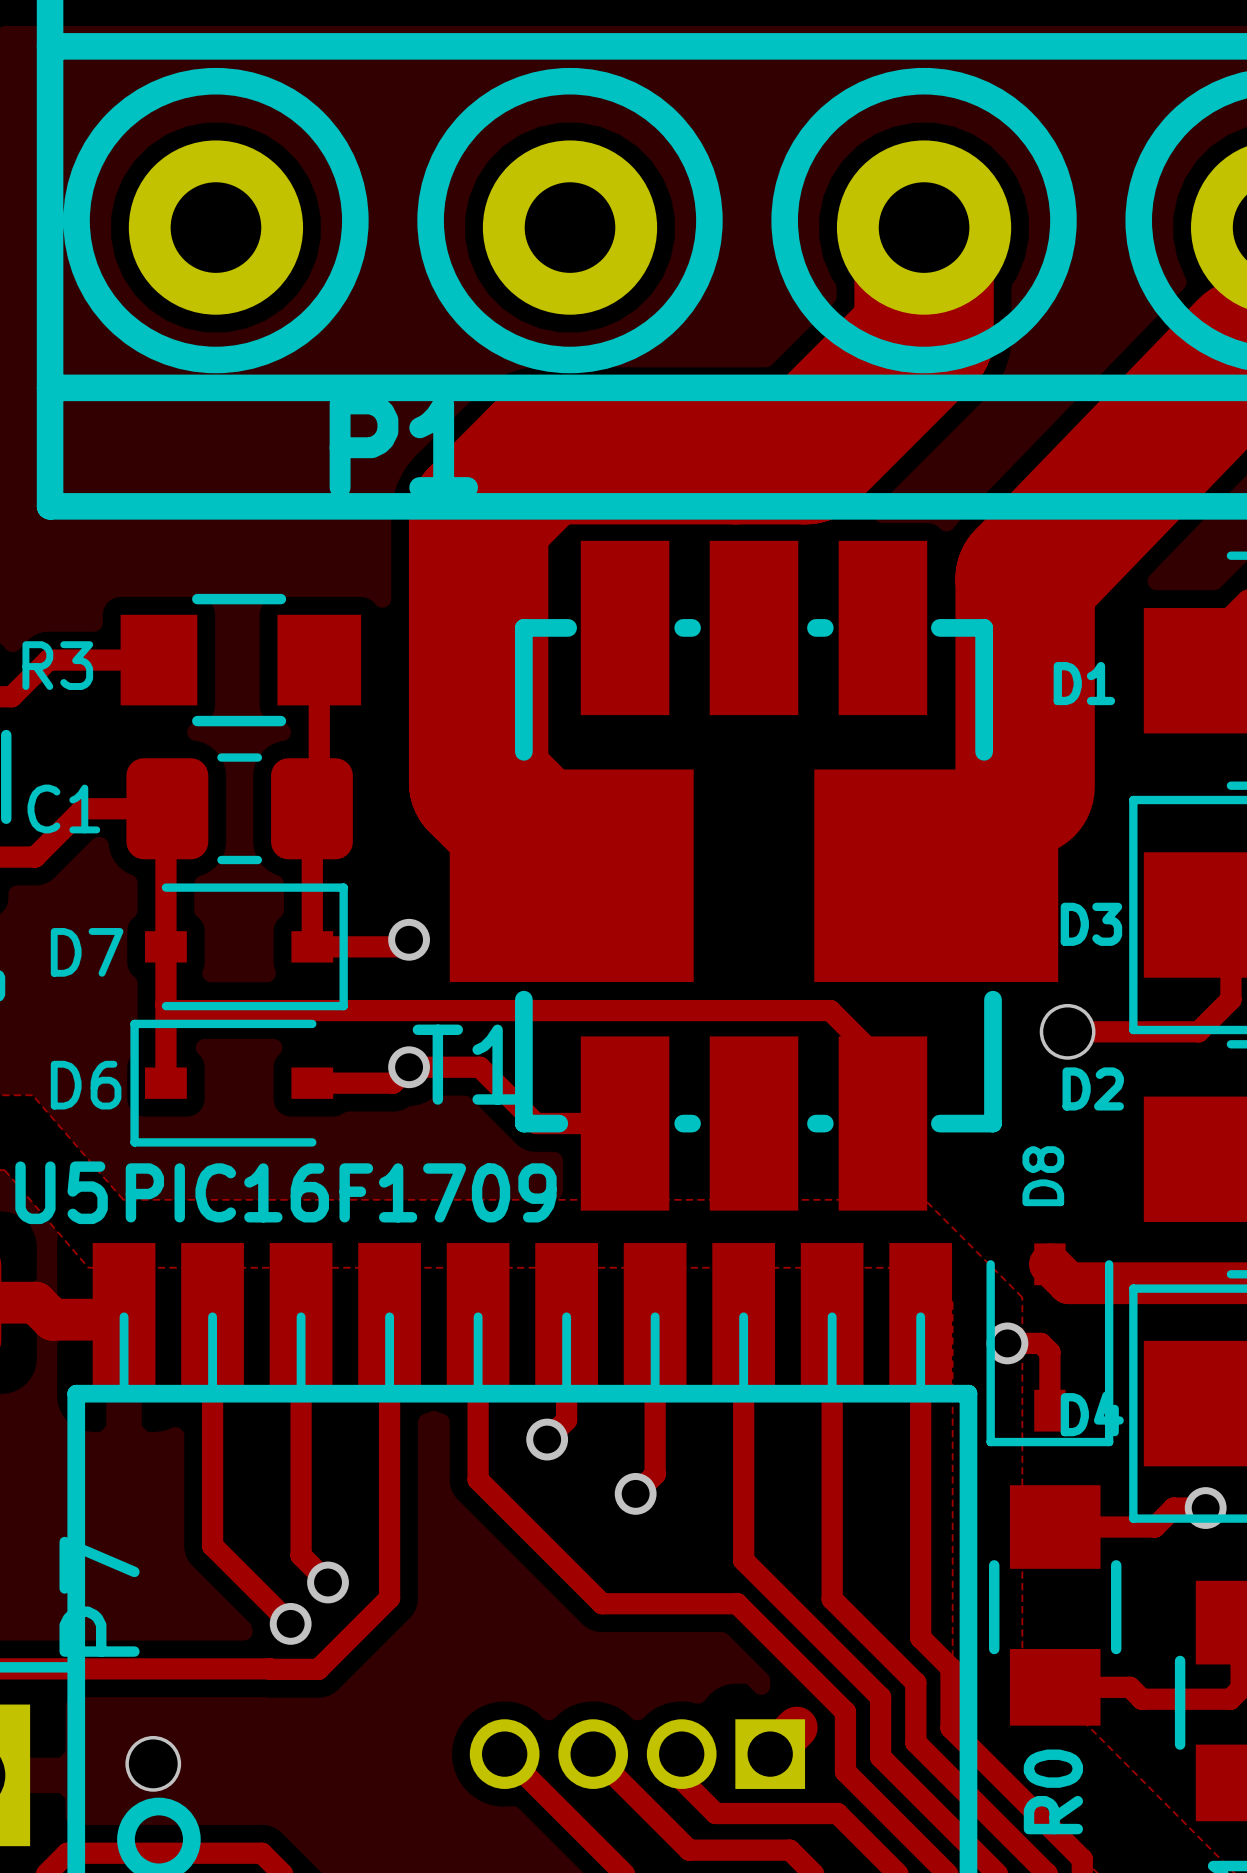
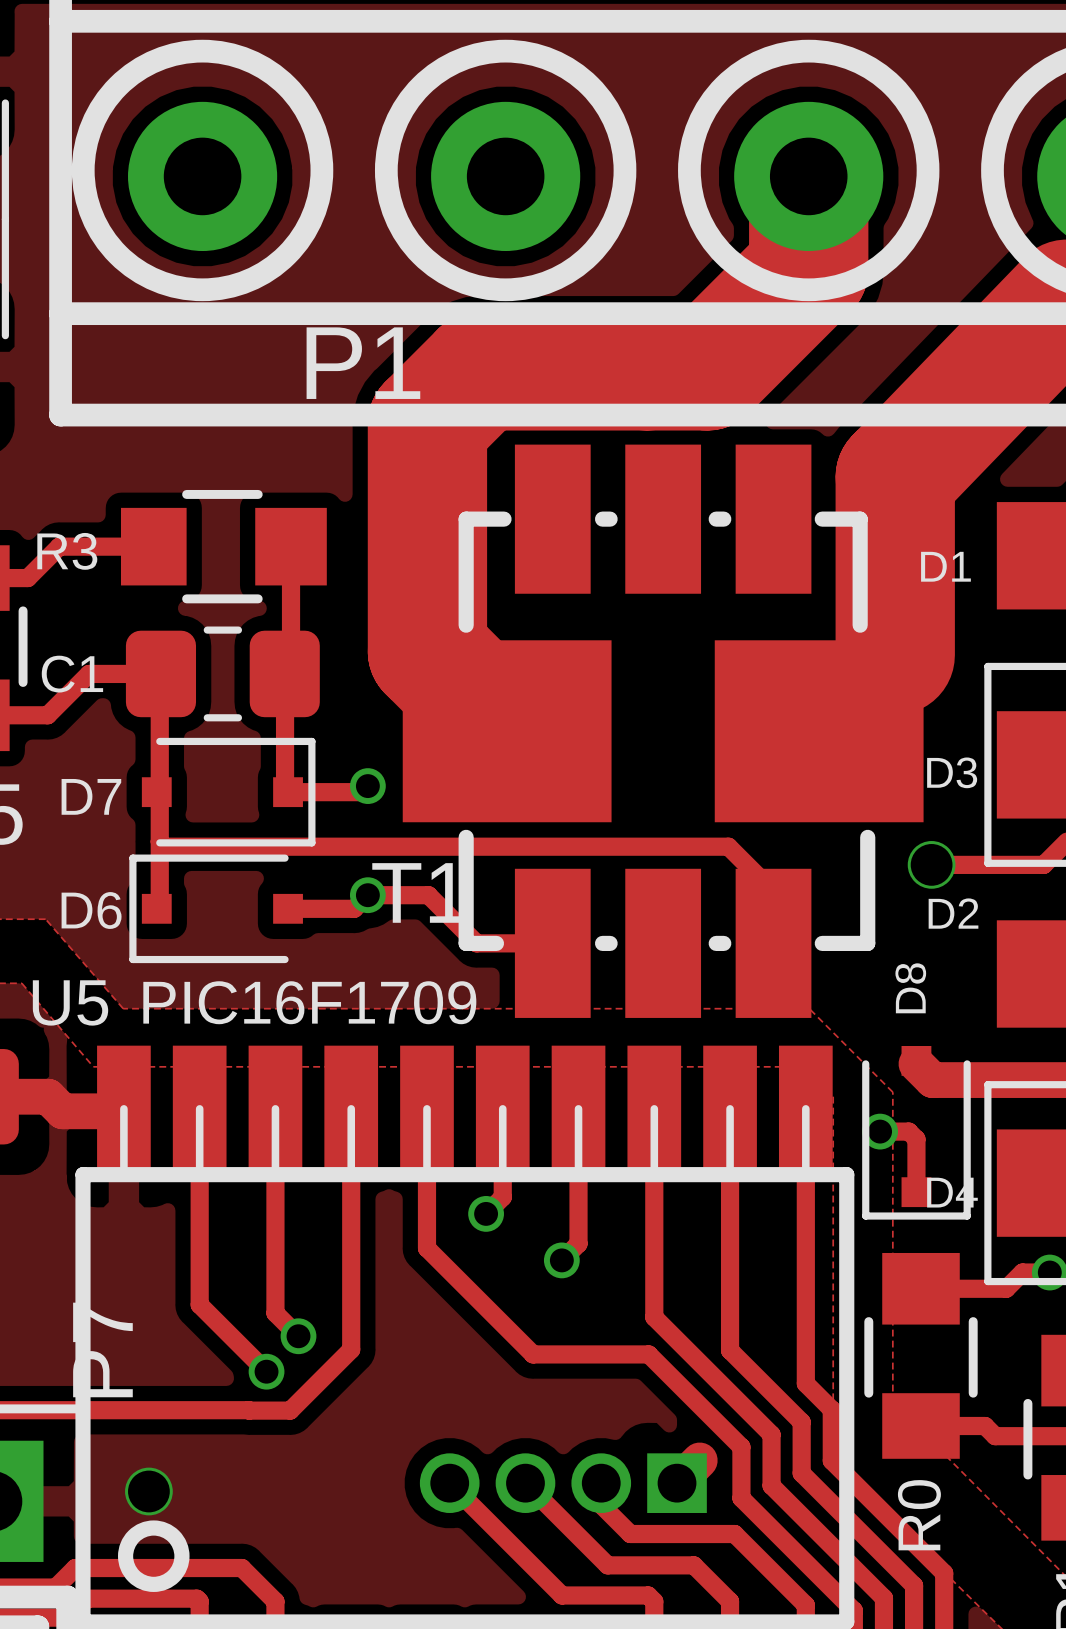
D7 footprint: [145, 883, 348, 1011] -> [141, 737, 316, 847]
D6 footprint: [130, 1019, 334, 1147] -> [129, 854, 303, 964]
D8 footprint: [986, 1243, 1114, 1447] -> [862, 1045, 971, 1220]

